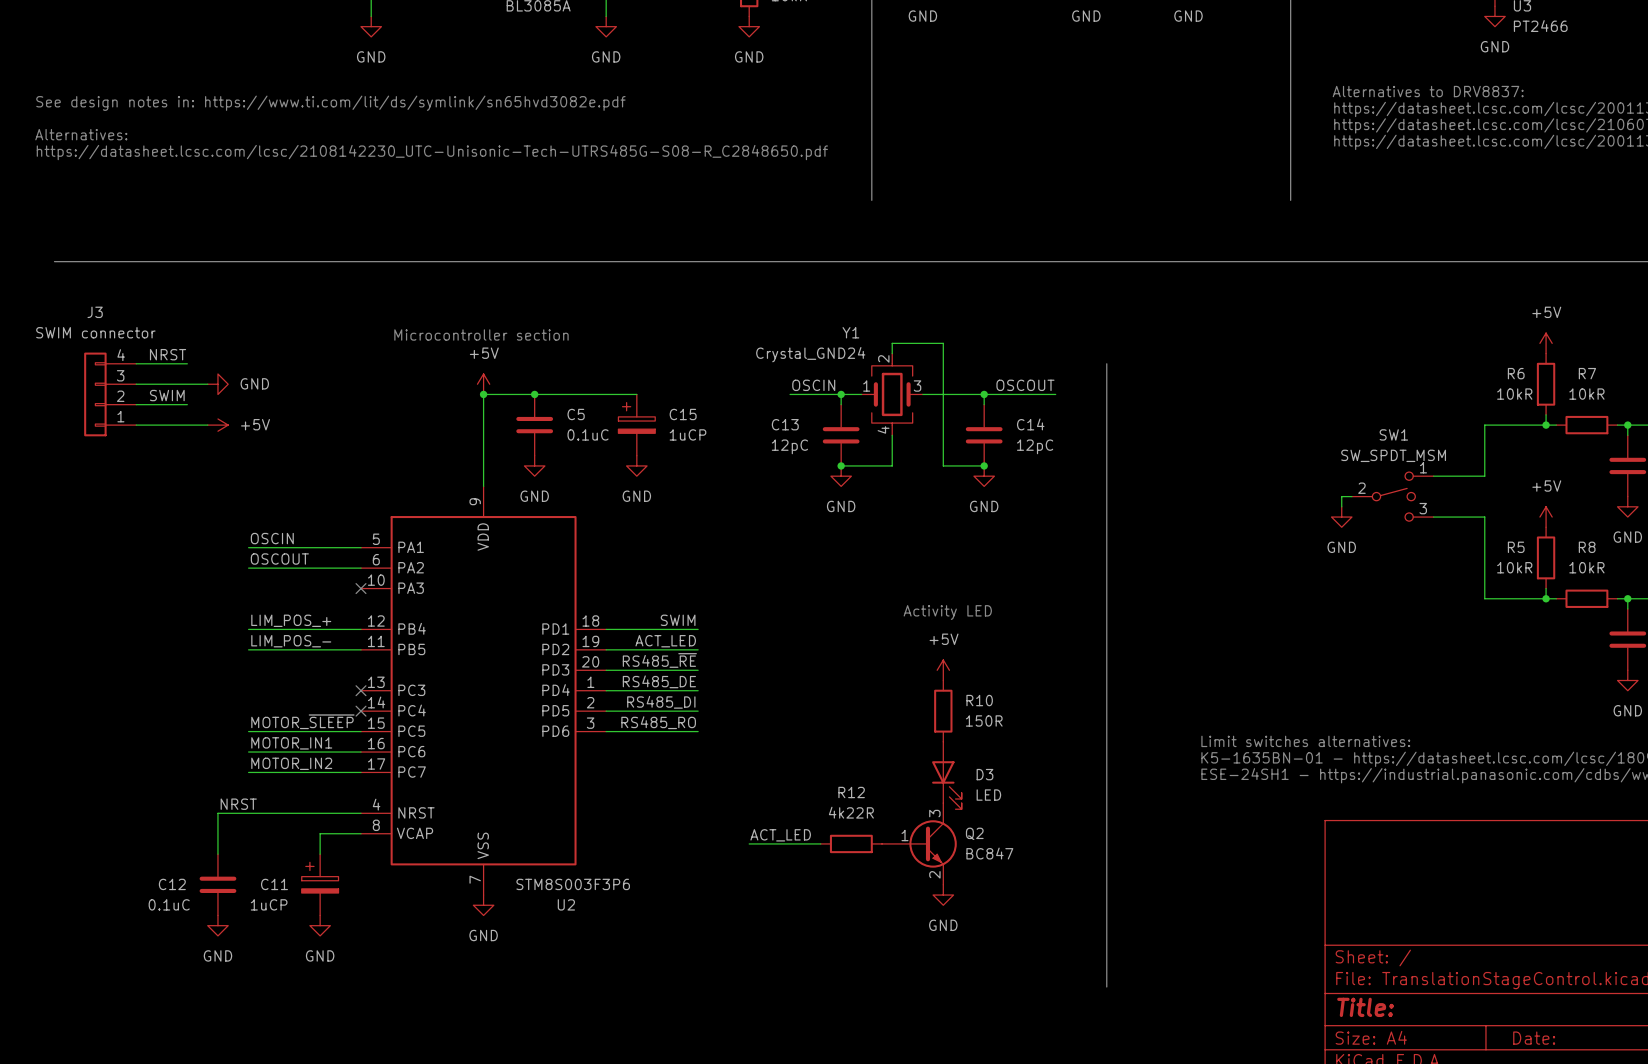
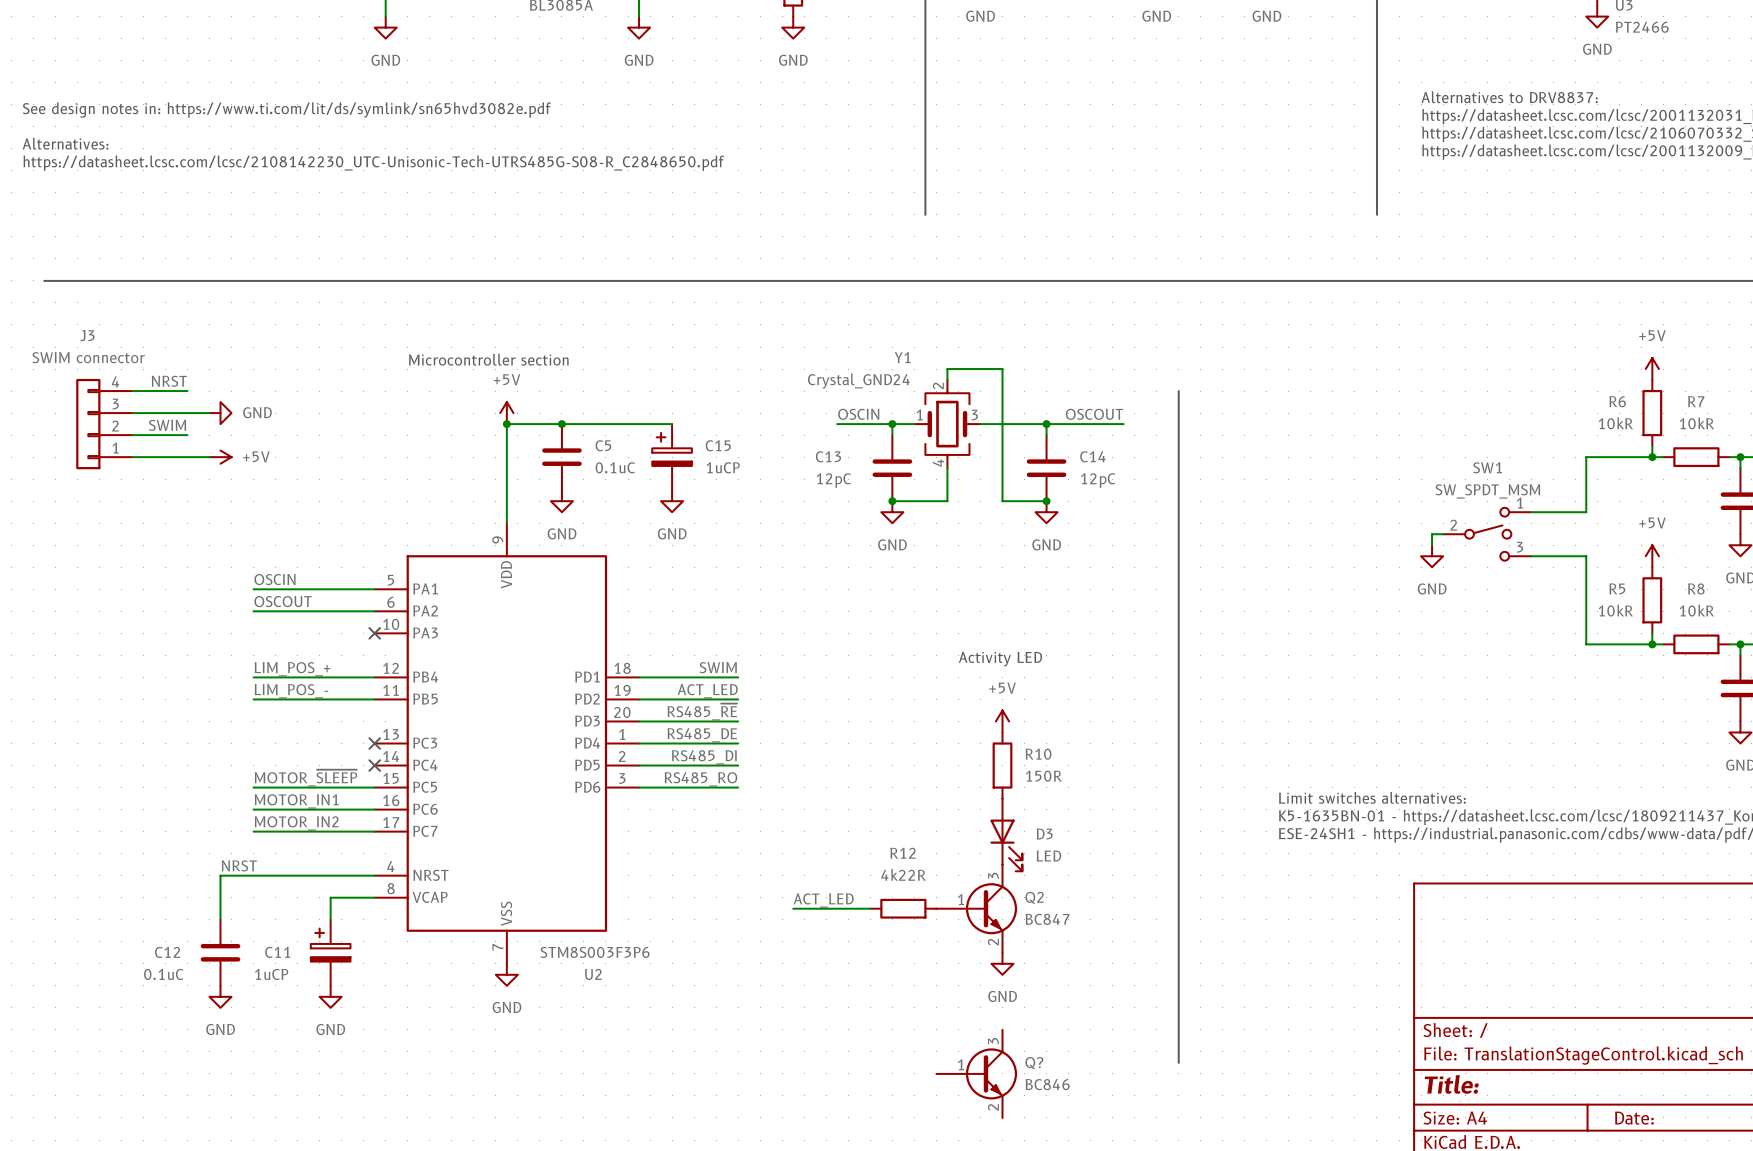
Q?: none -> BC846 (976, 1073)

